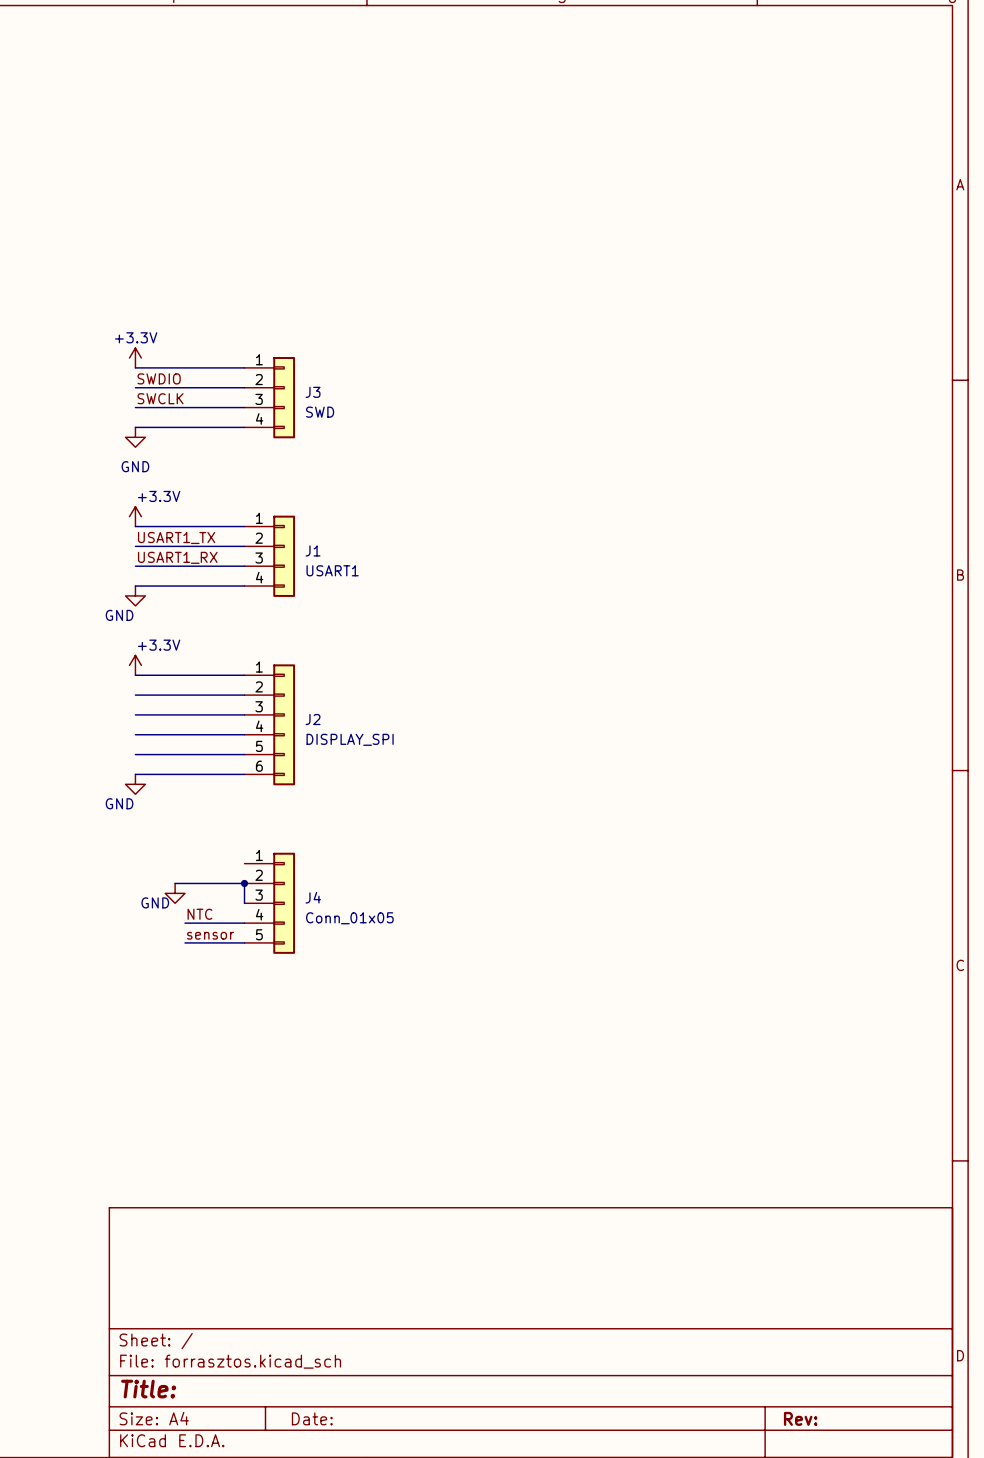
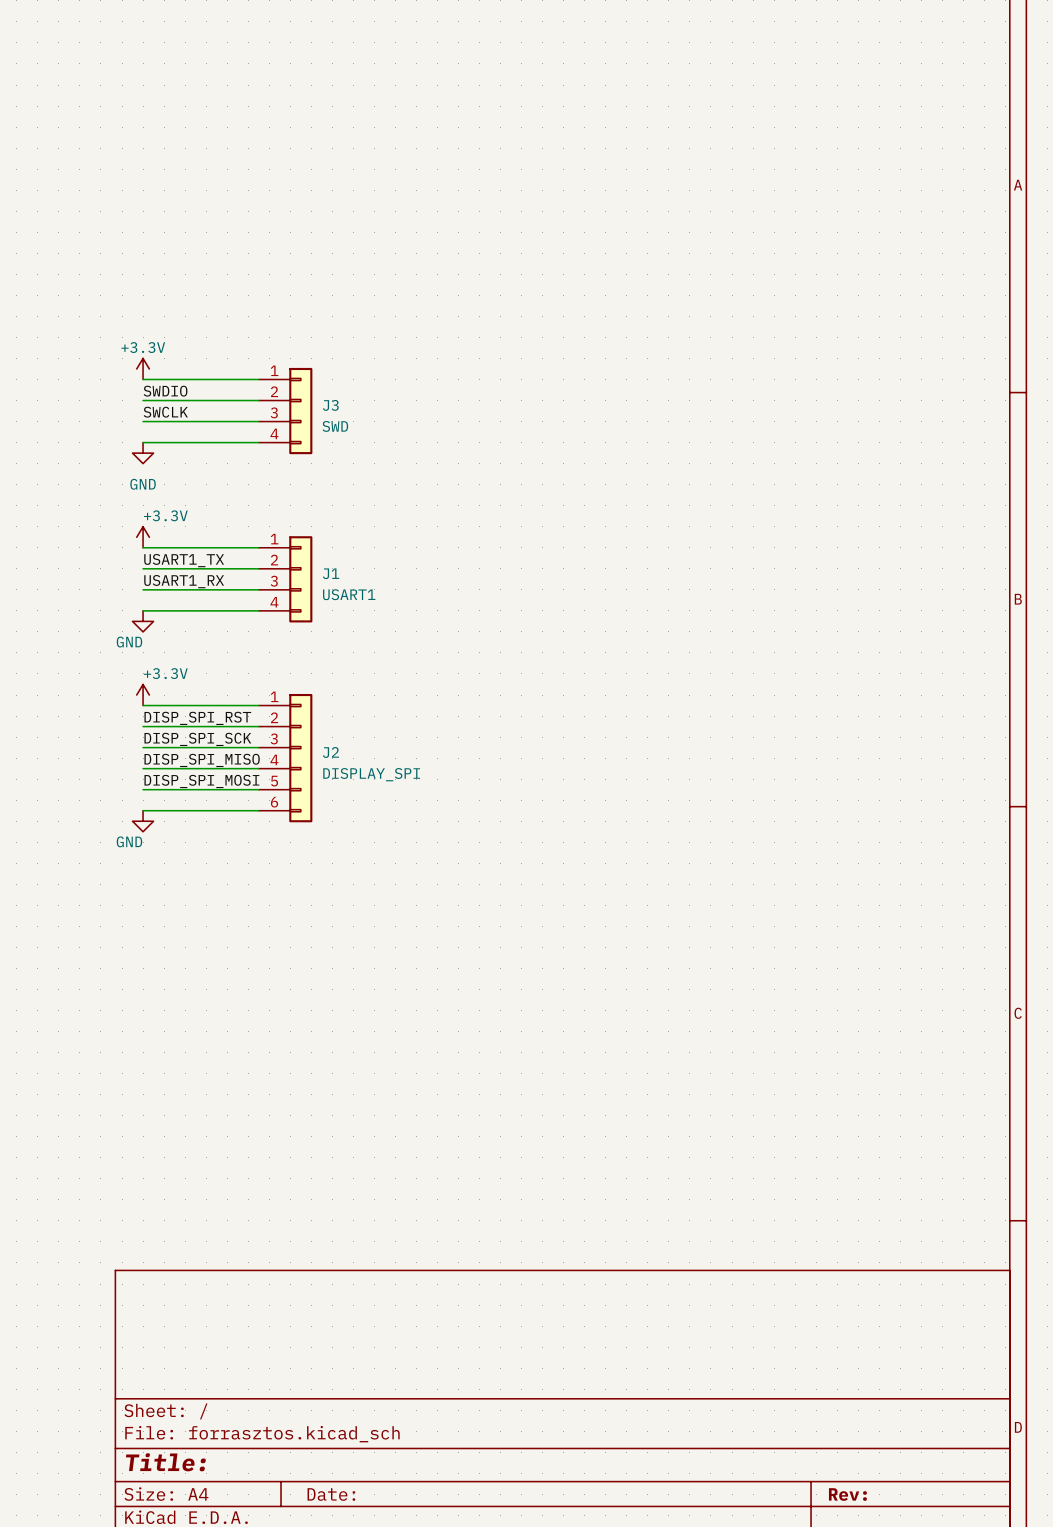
label: none -> DISP_SPI_RST (197, 718)
label: none -> DISP_SPI_SCK (197, 739)
label: none -> DISP_SPI_MISO (202, 760)
label: none -> DISP_SPI_MOSI (201, 781)
wire: (175, 883) (244, 883) (244, 903) -> none
junction: (244, 883) -> none
power symbol: GND (175, 893) -> none
J4: Conn_01x05 (269, 903) -> none
label: NTC (199, 914) -> none
wire: (185, 923) (244, 923) -> none
label: sensor (210, 935) -> none
wire: (185, 942) (244, 942) -> none

